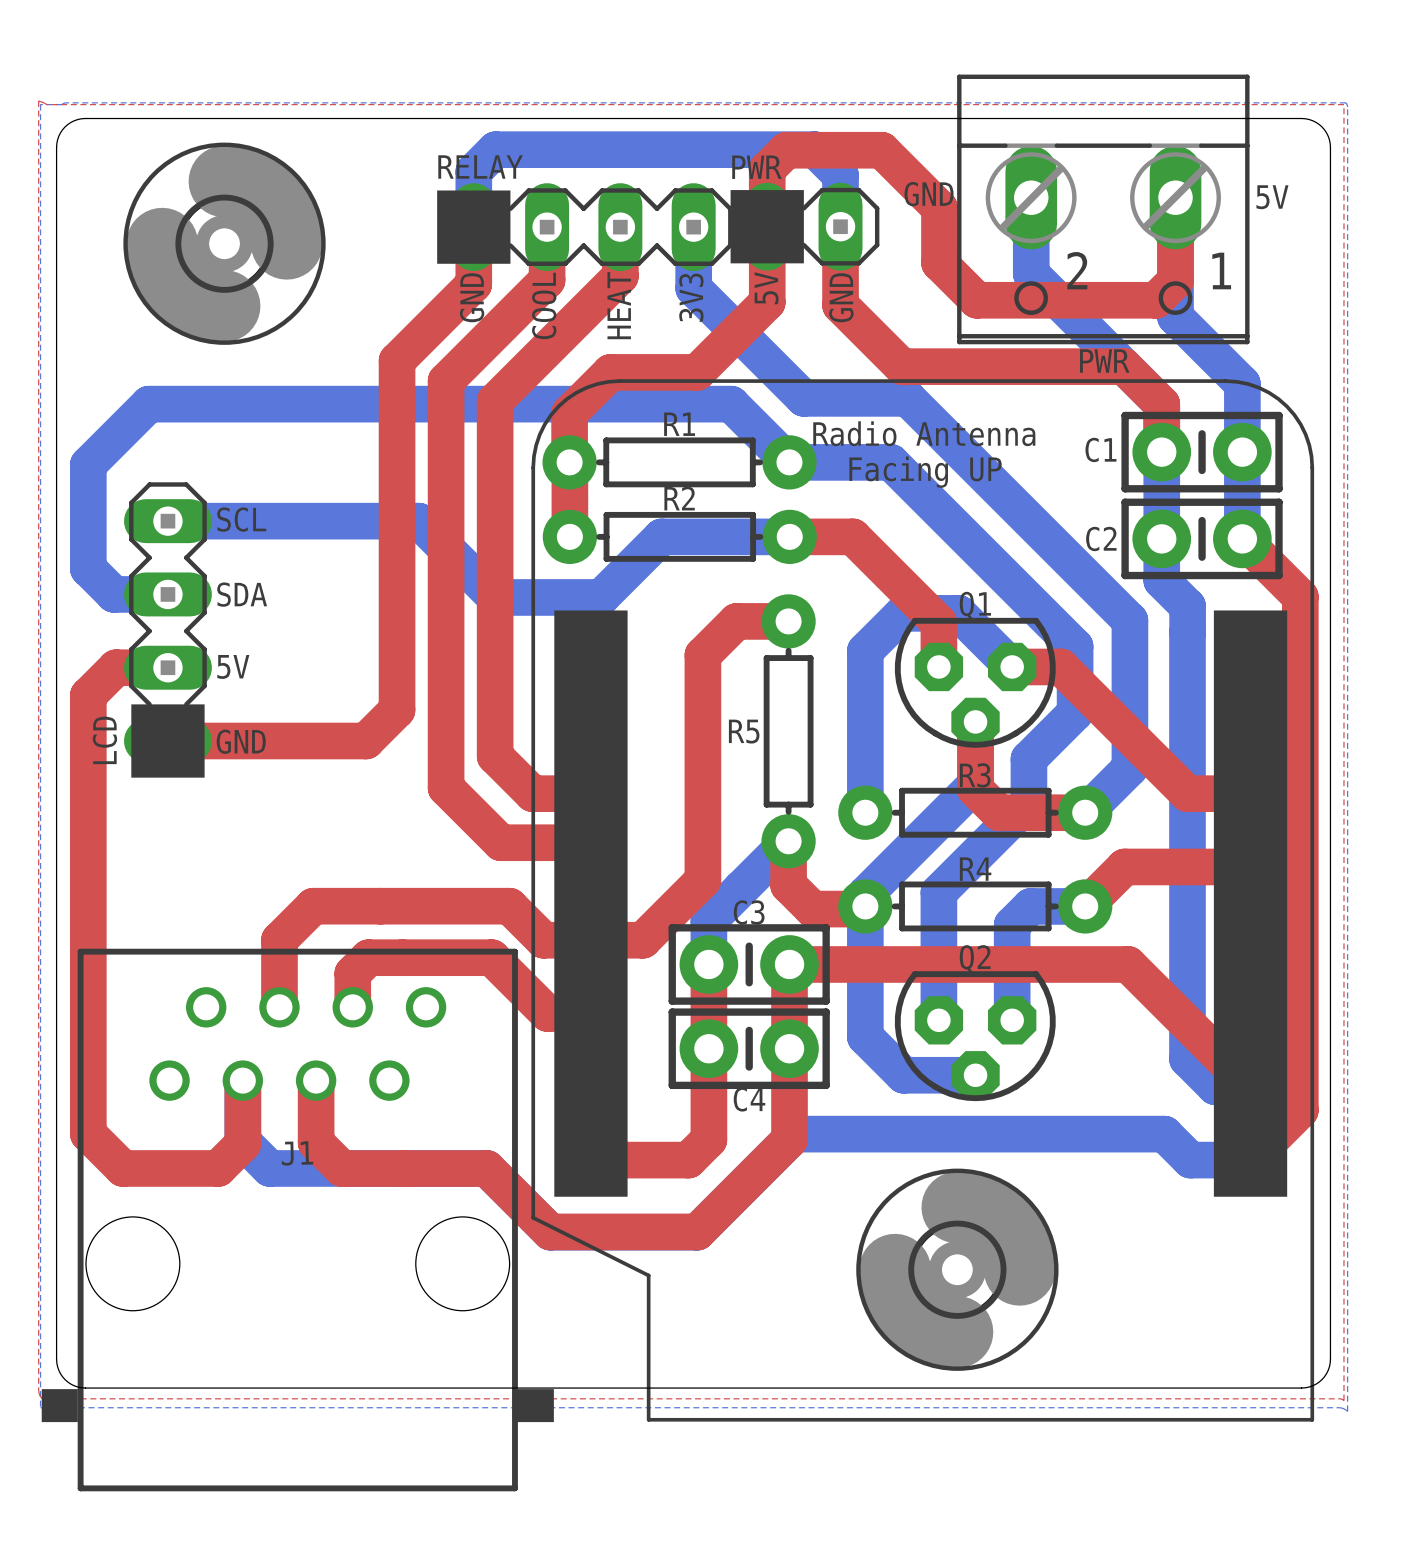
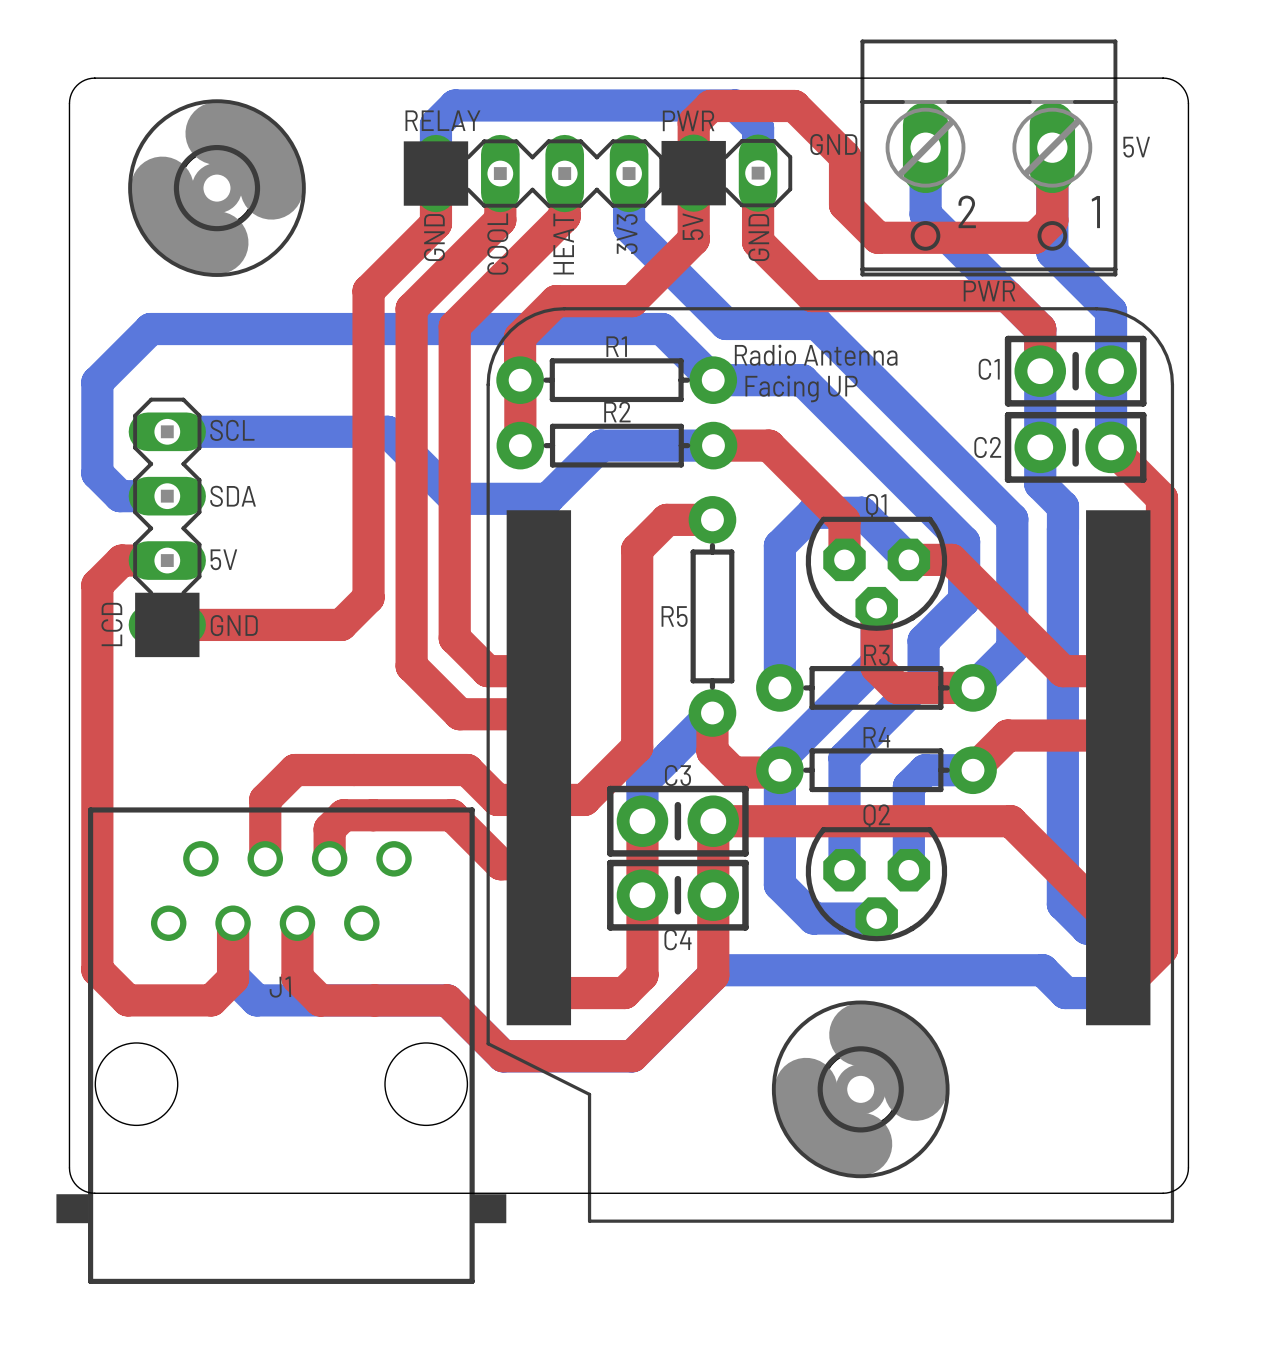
top zone outline: (38, 100) (38, 1390) (42, 1398) (1339, 1398) (1343, 1400) (1343, 104) (48, 104) (38, 100) -> none
bottom zone outline: (64, 103) (1345, 102) (1347, 107) (1347, 1411) (1338, 1407) (40, 1407) (40, 104) (64, 103) -> none

